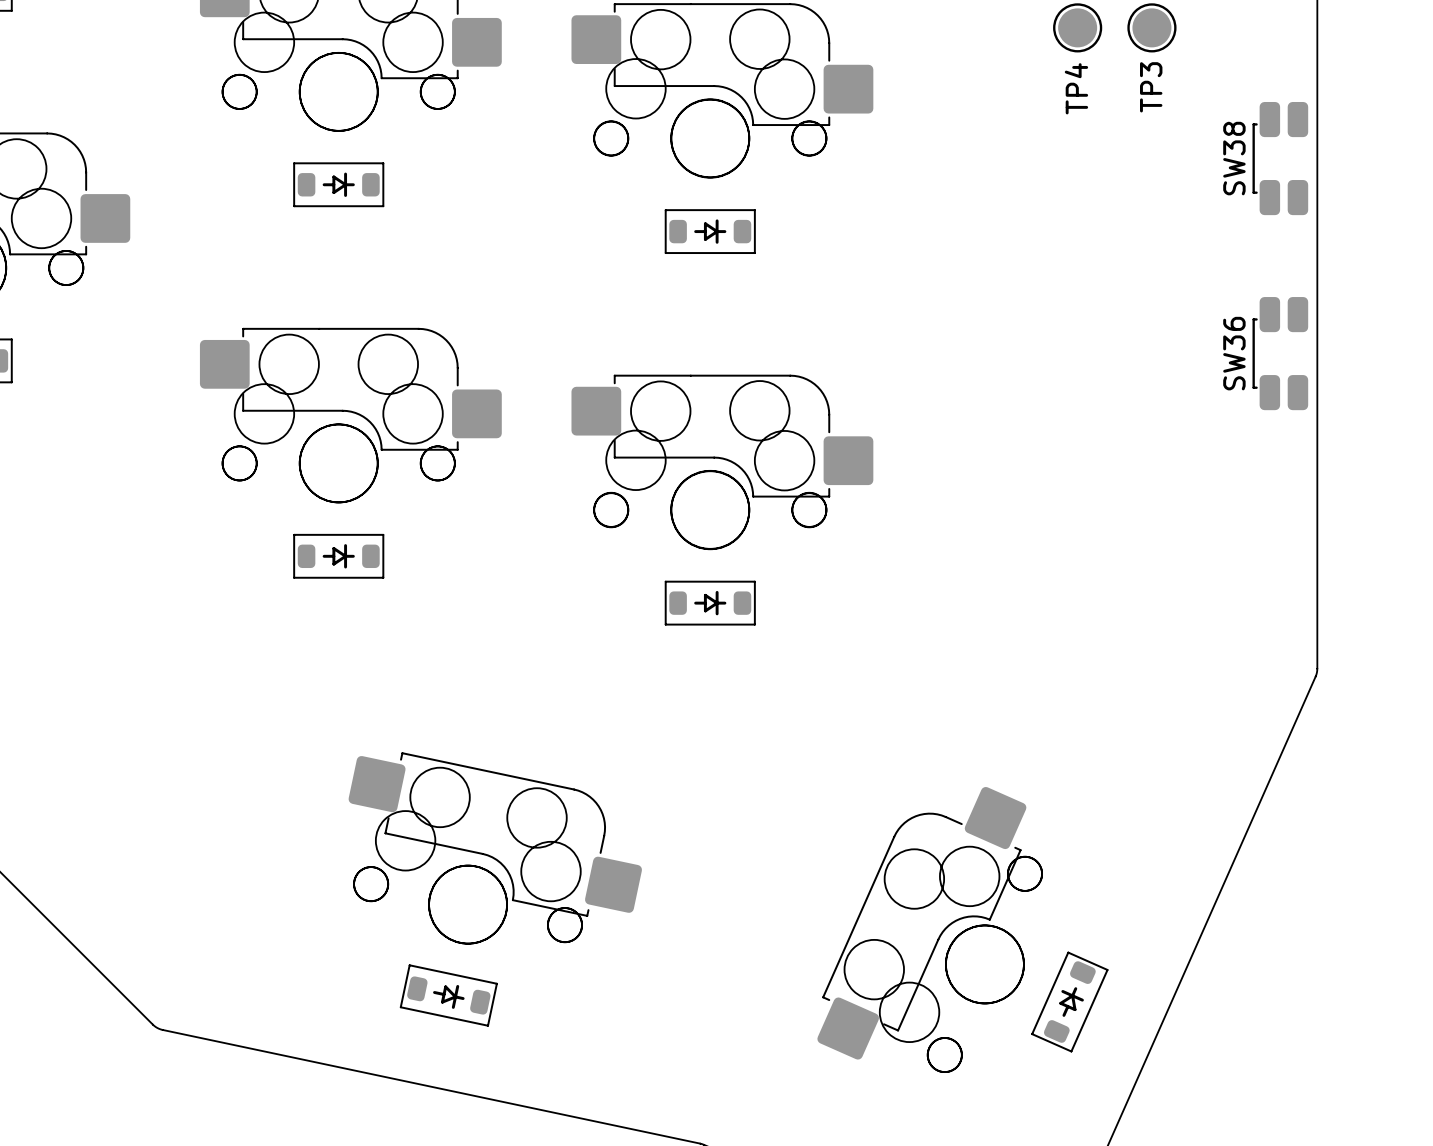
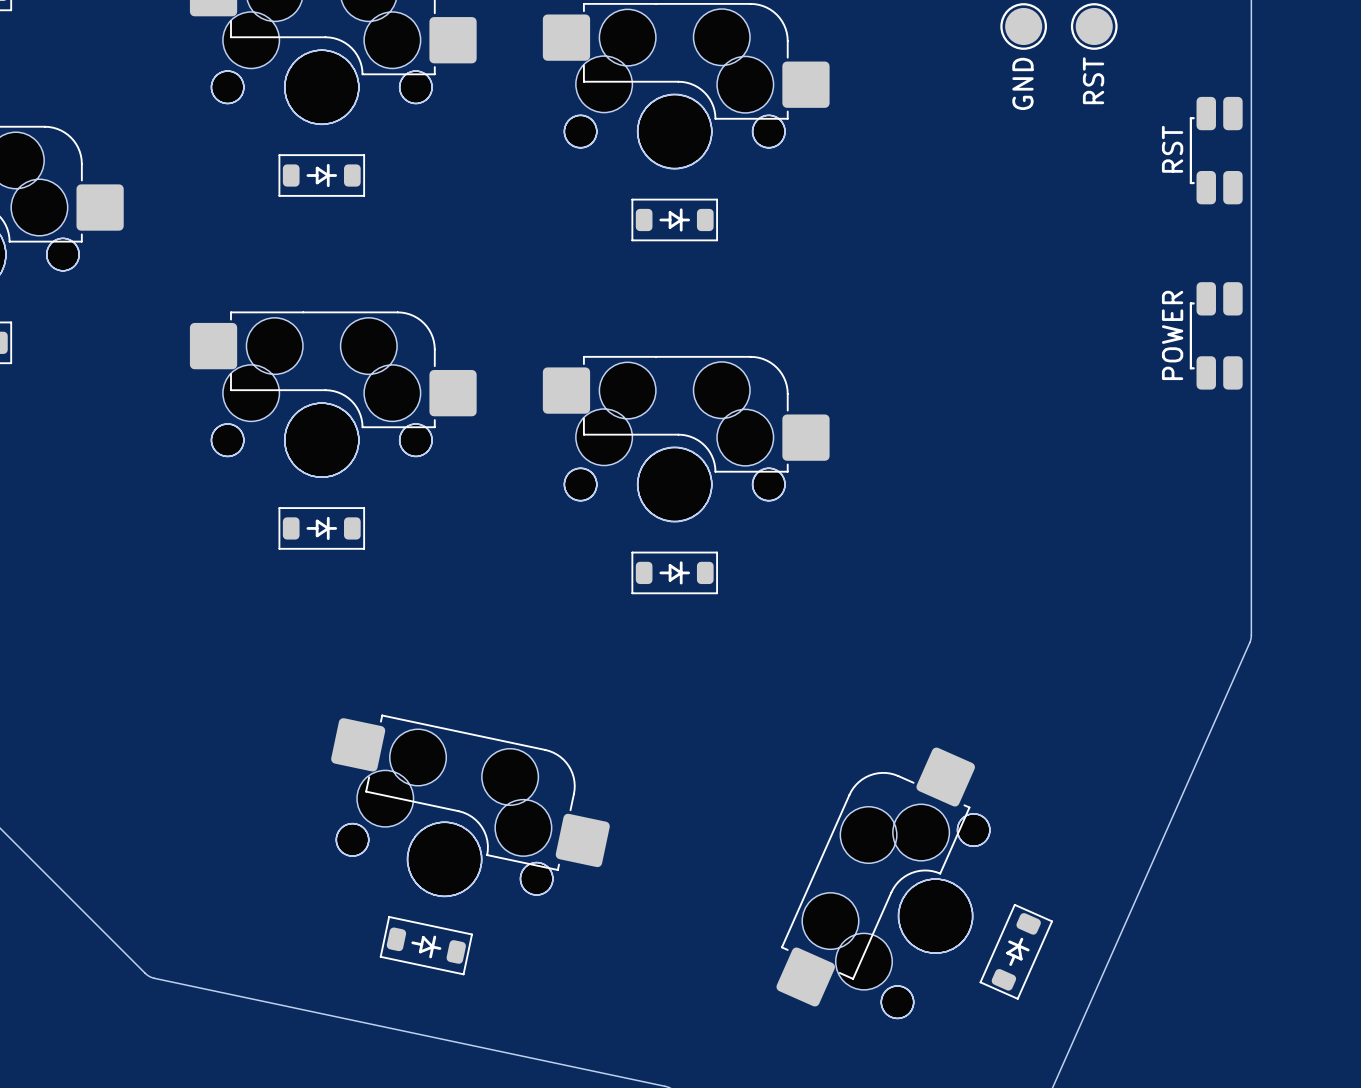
TP3 name: TP3 (1151, 87) -> RST (1093, 80)
TP4 name: TP4 (1076, 88) -> GND (1022, 83)
SW38 name: SW38 (1234, 158) -> RST (1172, 149)
SW36 name: SW36 (1234, 353) -> POWER (1172, 335)

